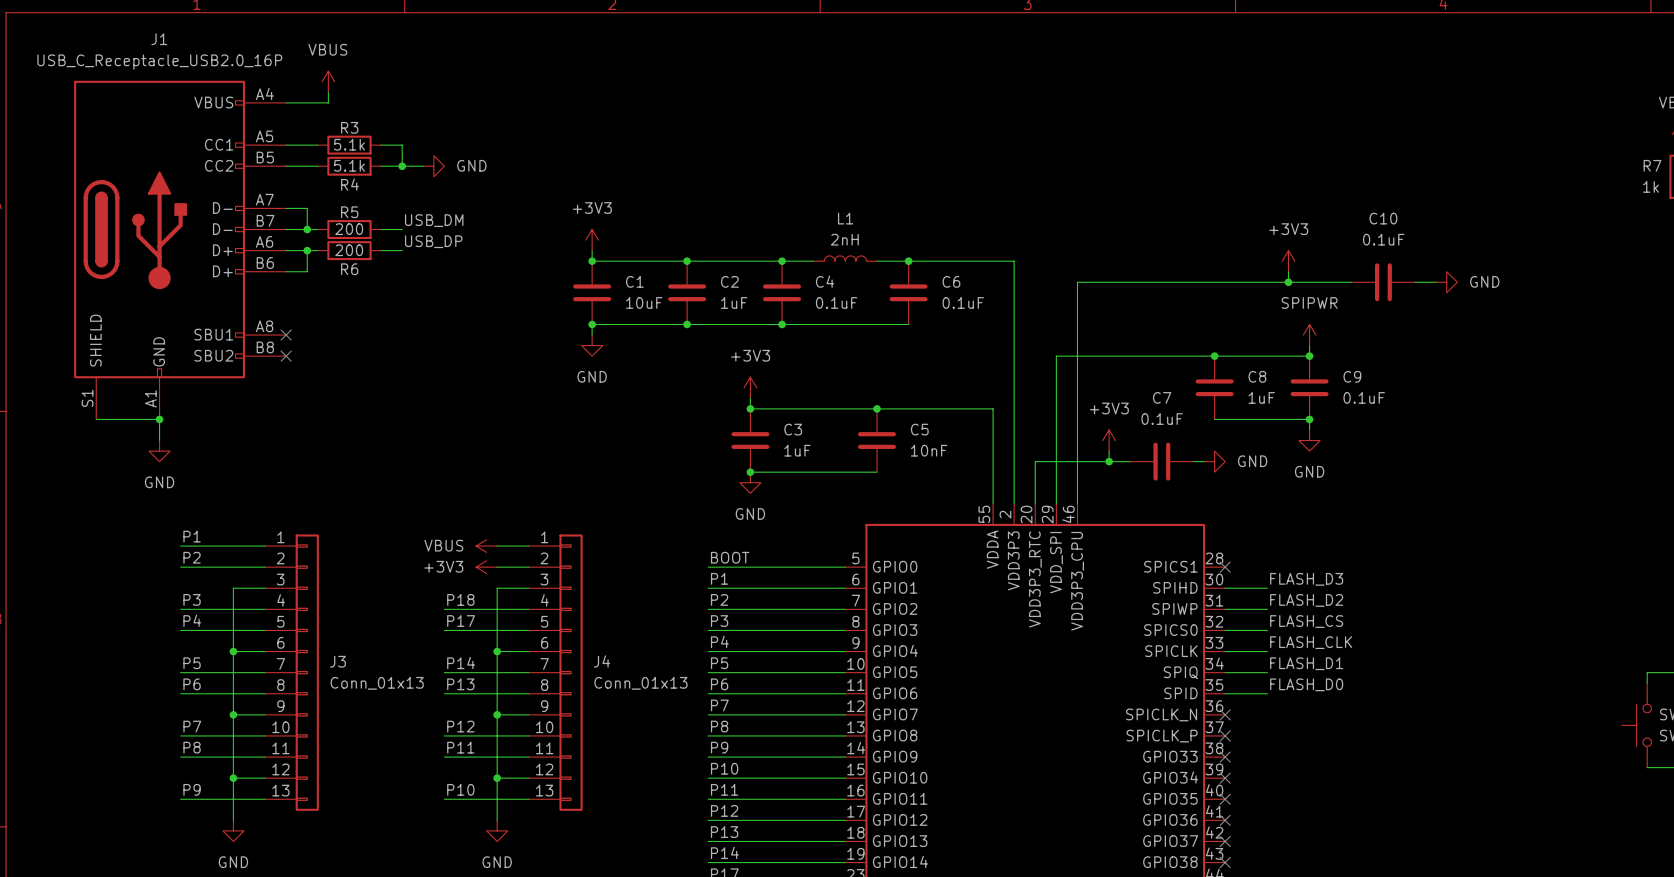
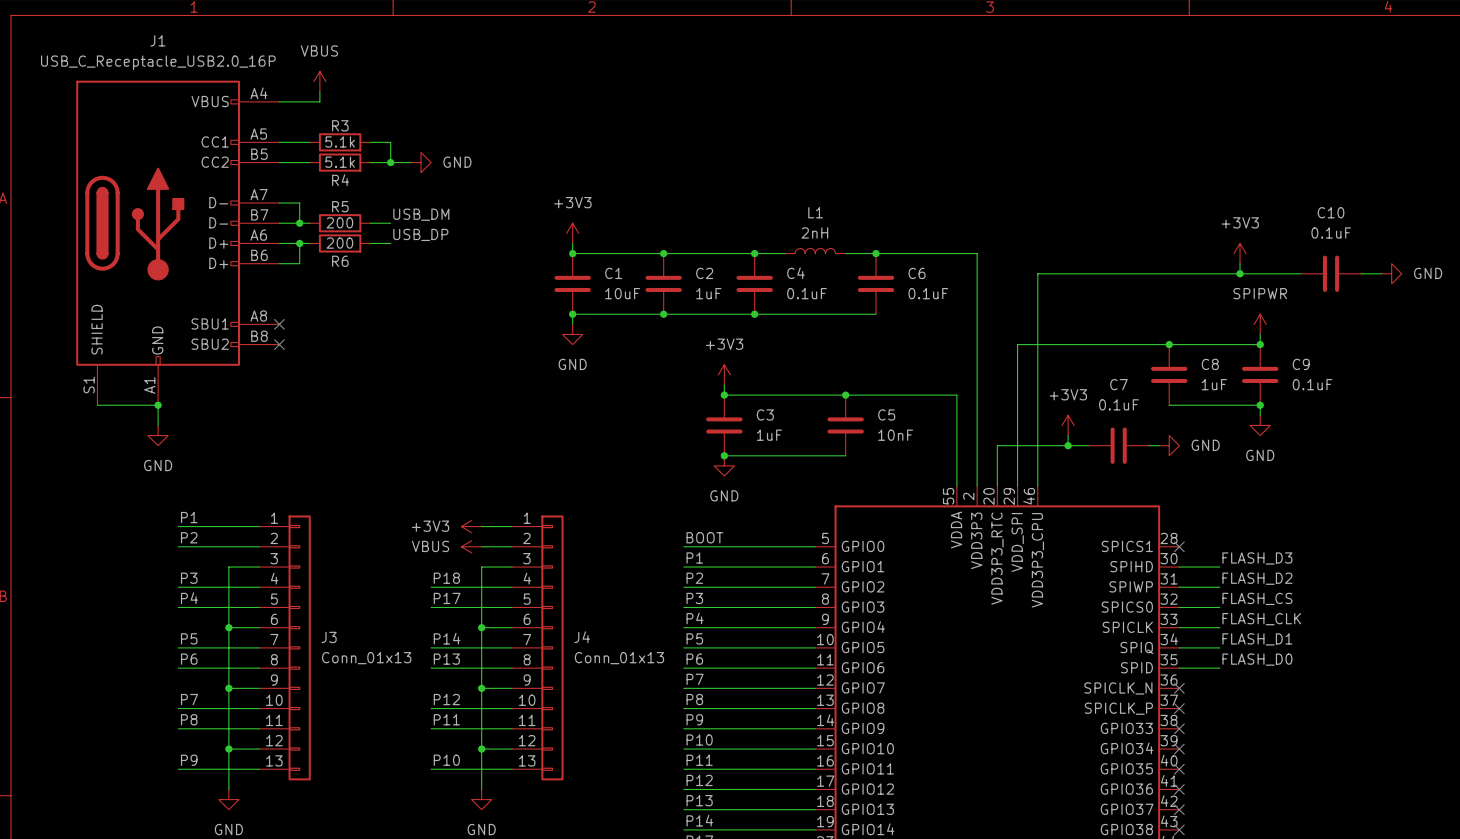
power symbol: VBUS (486, 546) -> +3V3 (471, 526)
power symbol: +3V3 (486, 567) -> VBUS (471, 546)

